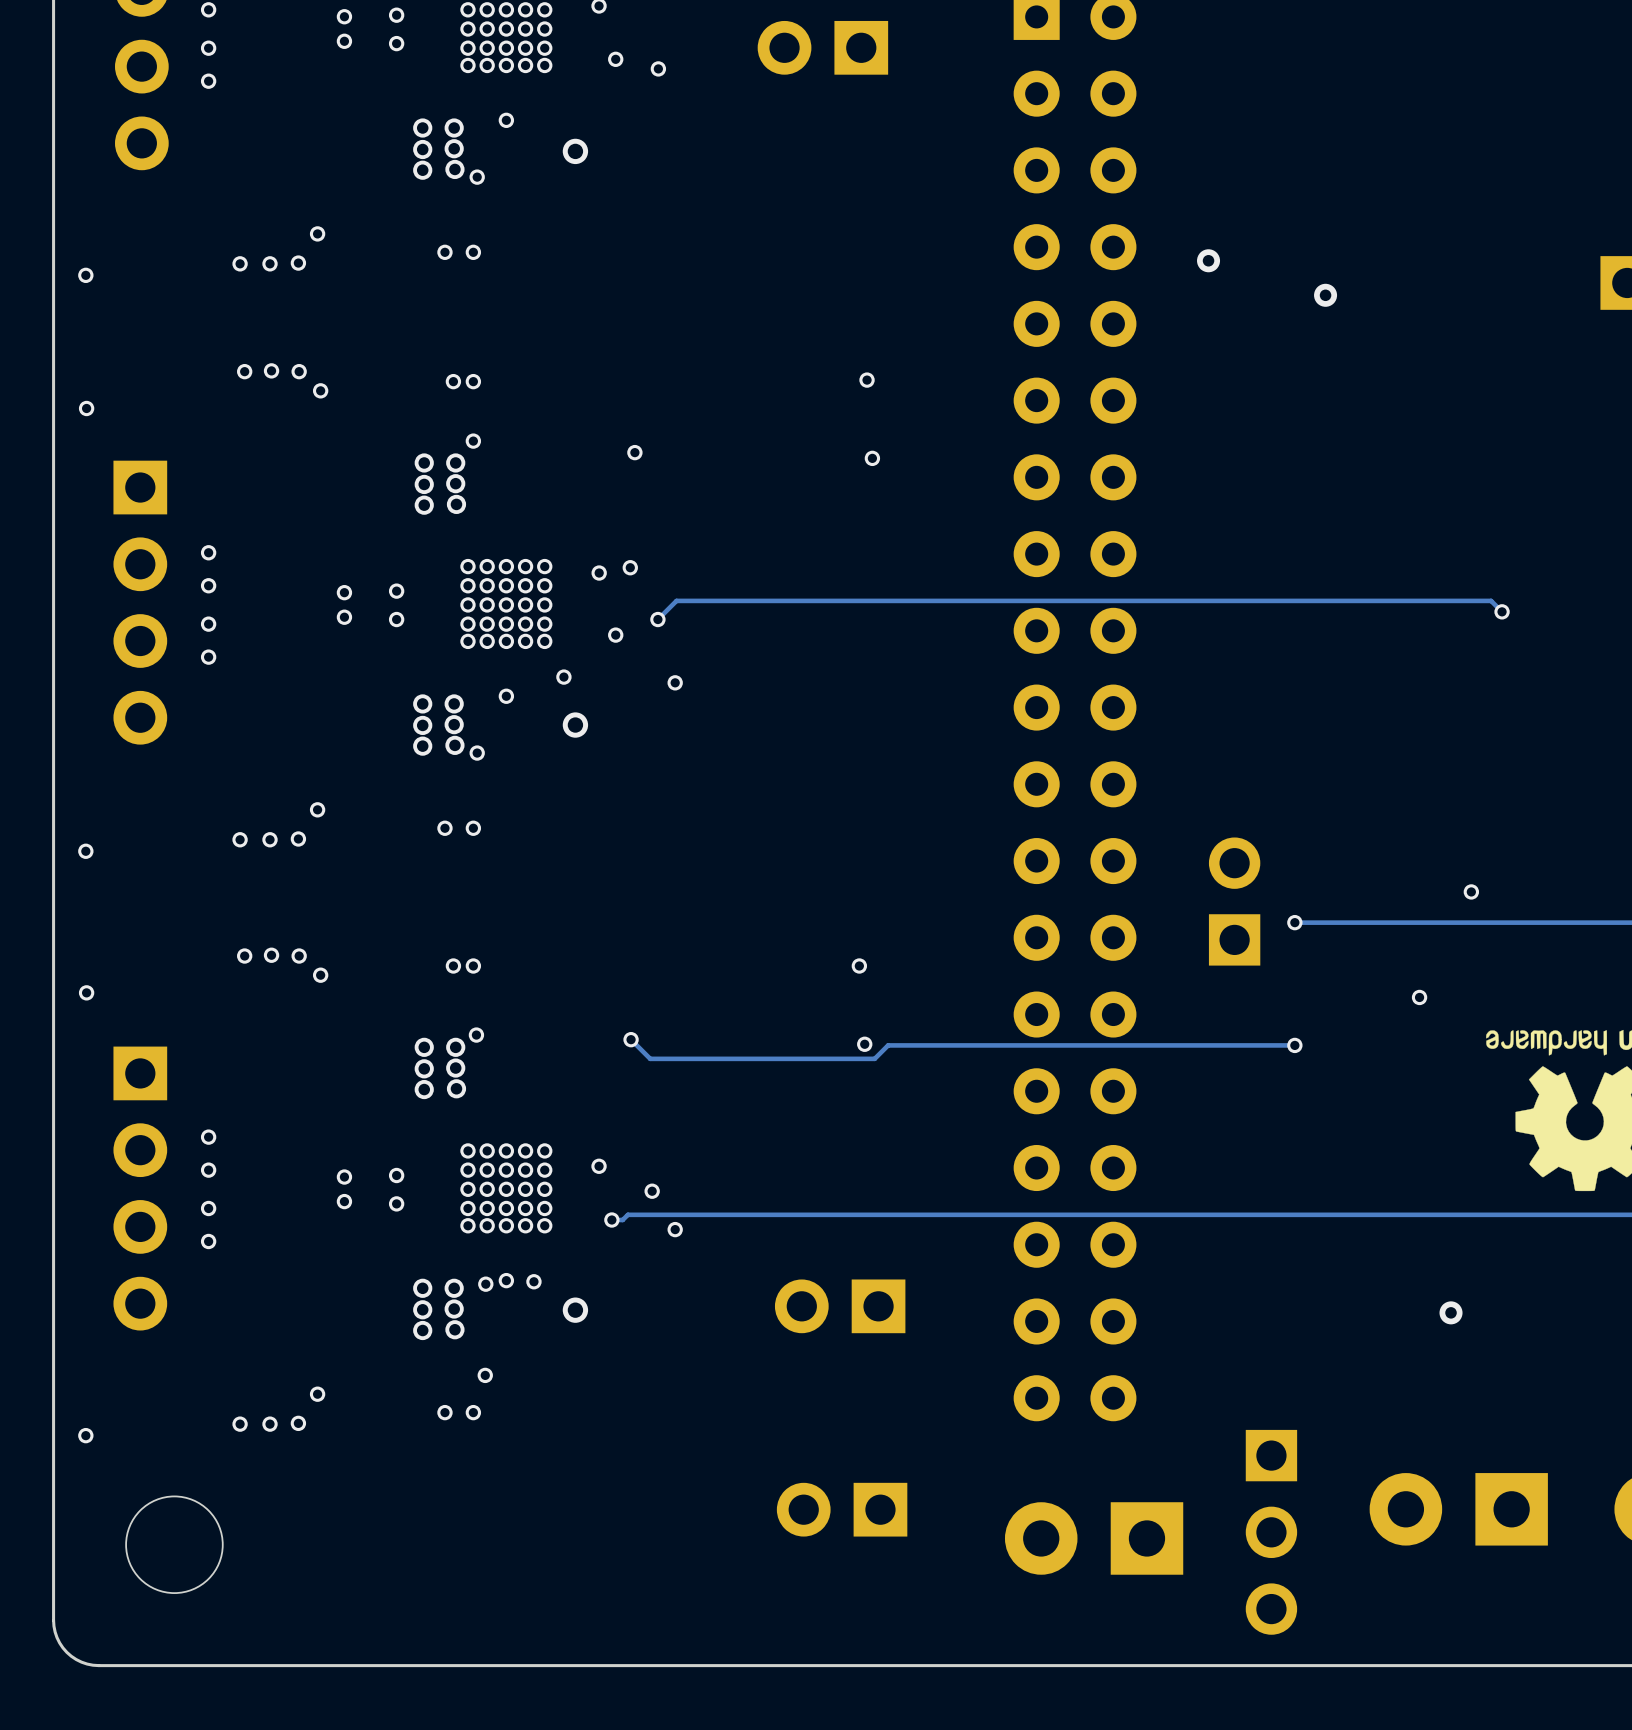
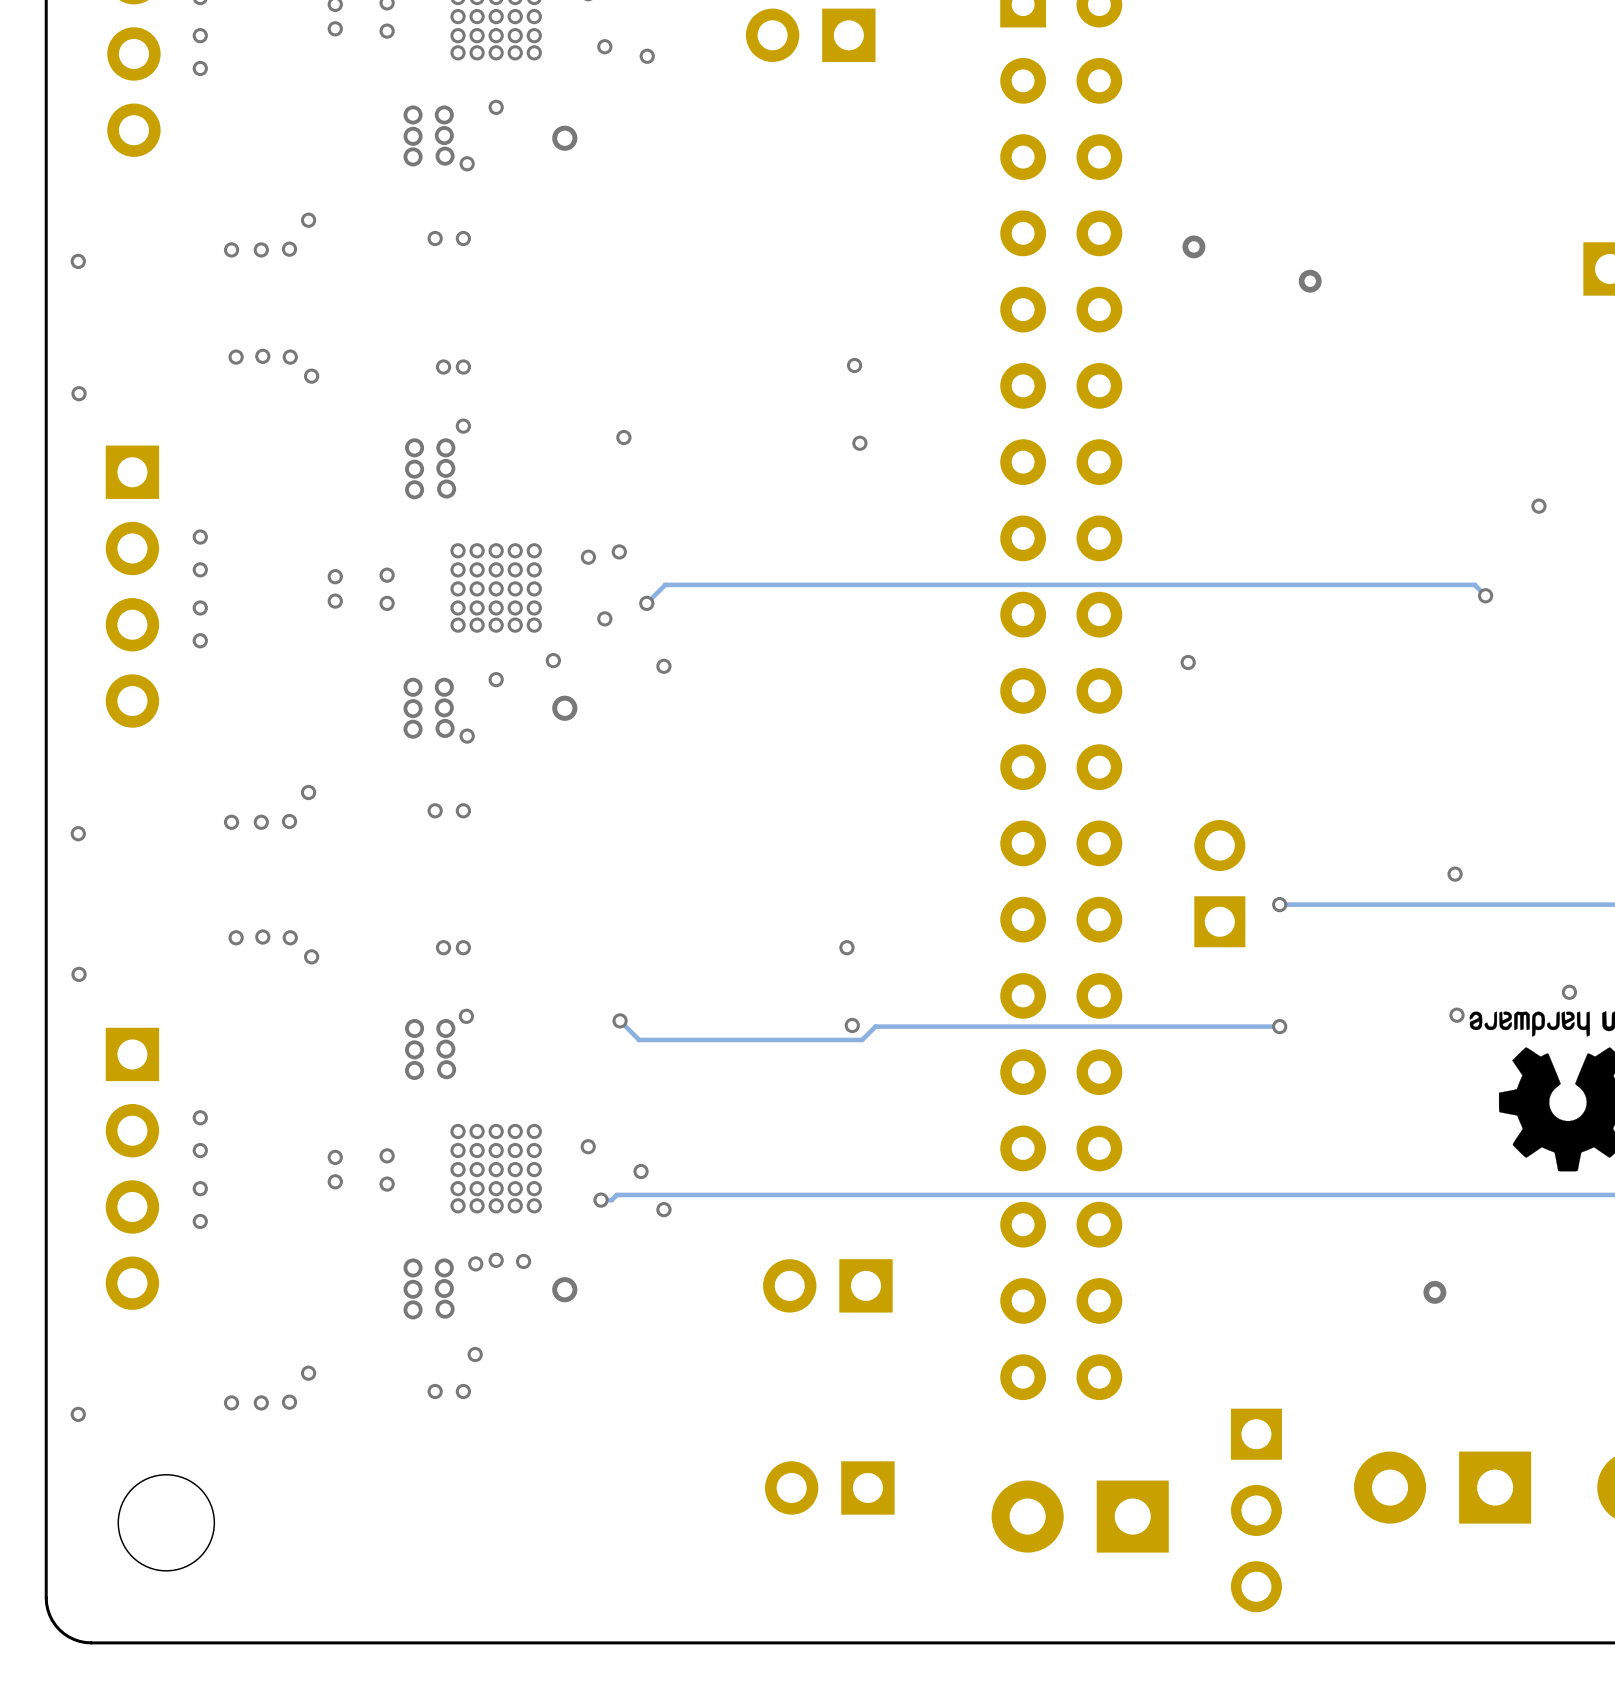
via: none -> (1538, 506)
via: none -> (1188, 662)
via position: (1419, 997) -> (1456, 1015)
via: none -> (1569, 992)

